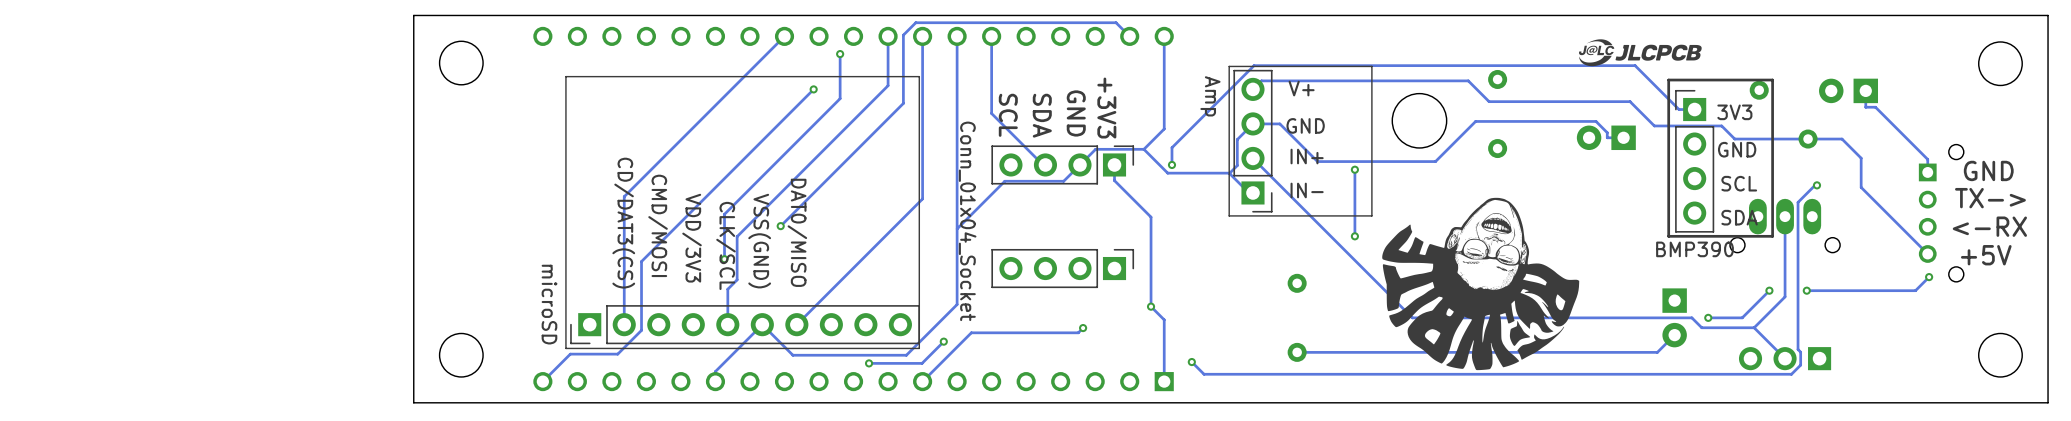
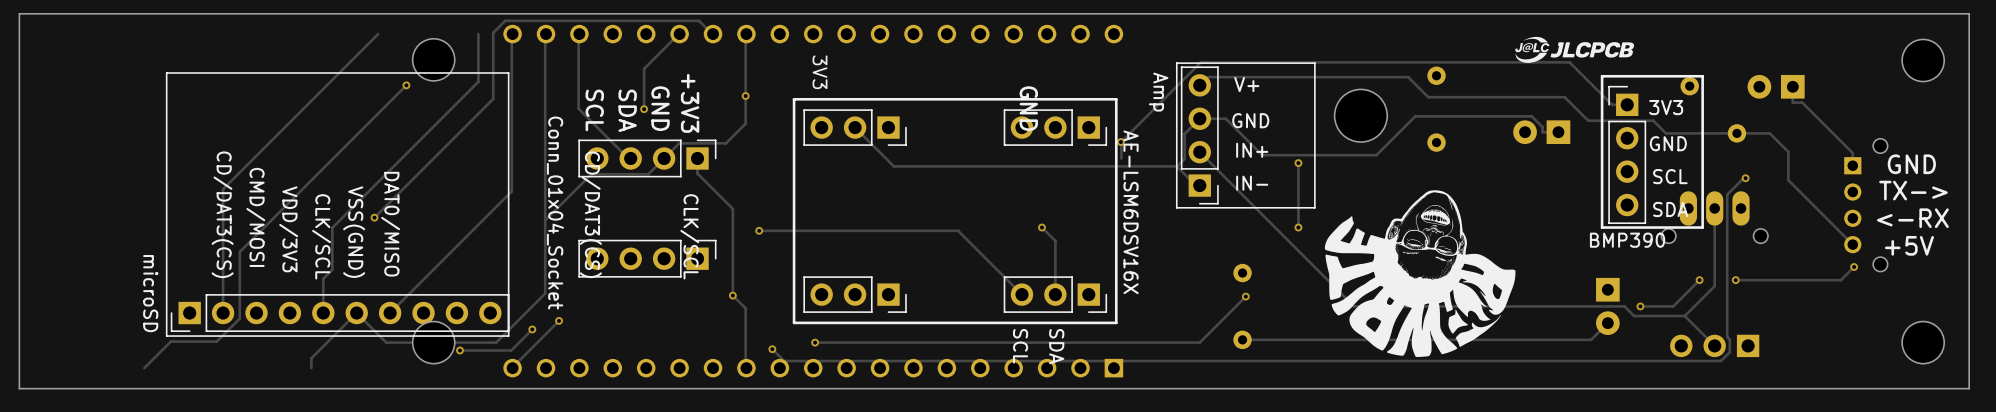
board edge: (413, 15) (413, 402) -> (387, 13) (19, 13) (19, 388) (387, 388)
track: none -> (378, 34) (223, 189) (223, 313)
track: none -> (478, 34) (478, 81) (332, 227) (332, 269) (323, 278) (323, 313)
track: none -> (511, 34) (511, 191) (390, 313)
track: none -> (545, 34) (545, 293) (496, 342) (386, 342) (356, 313) (311, 358) (311, 368)
track: none -> (578, 34) (578, 108) (628, 158) (630, 158)
track: none -> (678, 34) (644, 68) (644, 109)
track: none -> (712, 34) (699, 20) (505, 20) (493, 32) (493, 98) (374, 217)
track: none -> (745, 34) (745, 123) (726, 143) (679, 143) (648, 174) (591, 174) (545, 220)
track: (784, 36) (624, 196) (624, 324) -> none
track: (888, 36) (888, 85) (737, 236) (737, 279) (727, 289) (727, 324) -> none
track: (922, 36) (922, 198) (796, 324) -> none
track: (957, 36) (957, 304) (906, 355) -> (1245, 296) (1199, 342) (864, 342)
track: (991, 36) (991, 113) (1043, 164) (1045, 164) -> none
track: (1129, 36) (1116, 22) (915, 22) (903, 35) (903, 103) (780, 226) -> none
track: (1164, 36) (1164, 129) (1143, 149) -> none
track: (840, 54) (840, 98) (724, 214) (724, 259) -> none
via: (840, 54) -> none
text: none -> 3V3 (819, 72)
line: none -> (508, 72) (166, 72) (166, 336) (508, 336) (508, 72)
line: (919, 76) (565, 76) (565, 348) (919, 348) (919, 76) -> none
track: none -> (406, 85) (239, 251) (239, 318) (216, 341) (170, 341) (144, 368)
via: none -> (406, 85)
track: (813, 89) (641, 261) (641, 330) (617, 354) (570, 354) (542, 381) -> none
via position: (813, 89) -> (745, 96)
line: none -> (1116, 99) (794, 99) (794, 322) (1116, 322) (1116, 99)
text: none -> +3V3 (690, 103)
text: +3V3 (1106, 108) -> none
text: none -> GND (660, 108)
via: none -> (644, 109)
text: none -> SCL (594, 110)
text: none -> SDA (627, 110)
text: SCL (1008, 115) -> none
text: SDA (1042, 115) -> none
part: none -> (855, 127)
part: none -> (1055, 127)
track: (1143, 149) (1167, 173) -> (855, 127) (893, 166) (1117, 166)
track: (1143, 149) (1095, 149) (1063, 181) (1004, 181) (957, 228) -> none
part: none -> Conn_01x04_Socket (647, 158)
track: none -> (697, 158) (697, 173) (732, 208) (732, 295) (745, 308) (745, 368)
part: Conn_01x04_Socket (1062, 164) -> none
track: (1114, 164) (1114, 180) (1151, 217) (1151, 306) (1164, 319) (1164, 381) -> none
via position: (1171, 164) -> (1120, 142)
text: none -> AE-LSM6DSV16X (1131, 212)
text: none -> CD/DAT3(CS) (222, 214)
text: none -> CMD/MOSI (255, 217)
text: CMD/MOSI (658, 225) -> none
via: none -> (374, 217)
via position: (780, 226) -> (759, 230)
text: none -> DAT0/MISO (390, 224)
text: DAT0/MISO (797, 232) -> none
track: none -> (1041, 227) (1055, 240) (1055, 294)
via: none -> (1041, 227)
text: none -> VDD/3V3 (288, 229)
text: VDD/3V3 (692, 238) -> none
track: none -> (759, 230) (958, 230) (1021, 294)
text: none -> VSS(GND) (354, 232)
text: VSS(GND) (759, 241) -> none
text: none -> CLK/SCL (321, 236)
via: (724, 259) -> none
part: none -> (647, 258)
part: (1062, 268) -> none
part: none -> (855, 294)
part: none -> (1055, 294)
via: none -> (732, 295)
via: (1151, 306) -> none
via: none -> (1245, 296)
part: none -> microSD (340, 313)
part: microSD (745, 324) -> none
track: (1083, 328) (1078, 332) (971, 332) (922, 381) -> none
via: (1083, 328) -> none
track: none -> (559, 320) (511, 368)
via: none -> (559, 320)
track: none -> (532, 329) (511, 350) (459, 350)
via: none -> (532, 329)
track: (943, 341) (922, 363) (869, 363) -> none
via: (943, 341) -> none
track: (855, 355) (792, 355) (762, 324) (715, 371) (715, 381) -> none
text: none -> SCL (1020, 346)
text: none -> SDA (1056, 346)
via: none -> (772, 349)
track: (1191, 362) (1204, 374) -> (772, 349) (784, 361) (1152, 361)
via: (1191, 362) -> none
via: none -> (459, 350)
via position: (869, 363) -> (815, 342)

